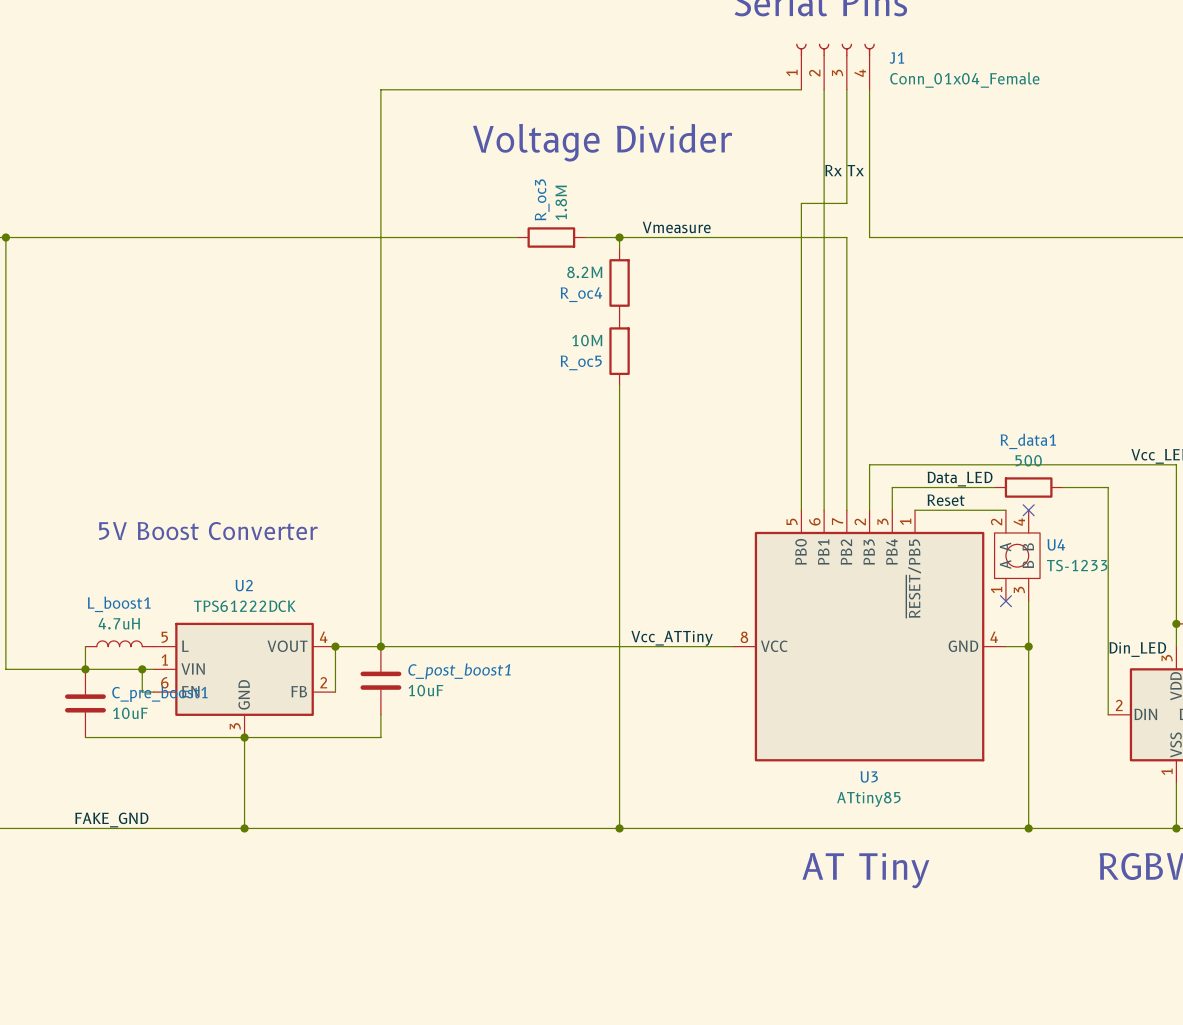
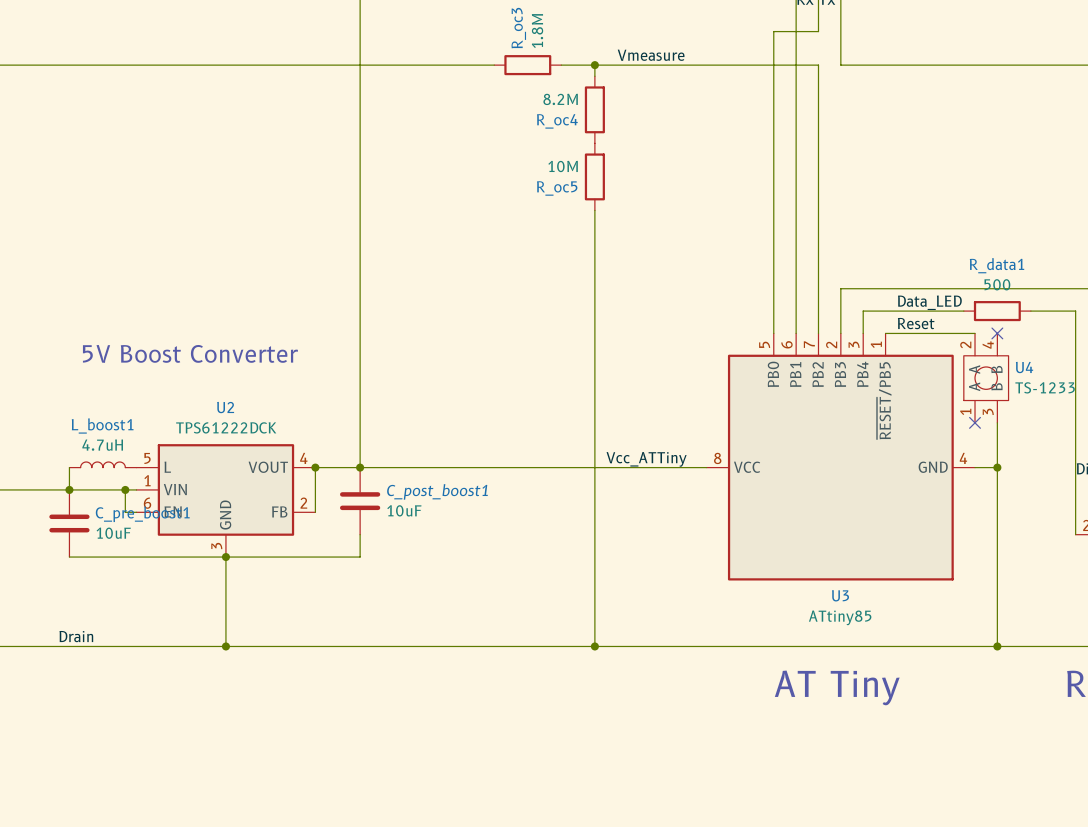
label: FAKE_GND (111, 820) -> Drain (76, 636)

